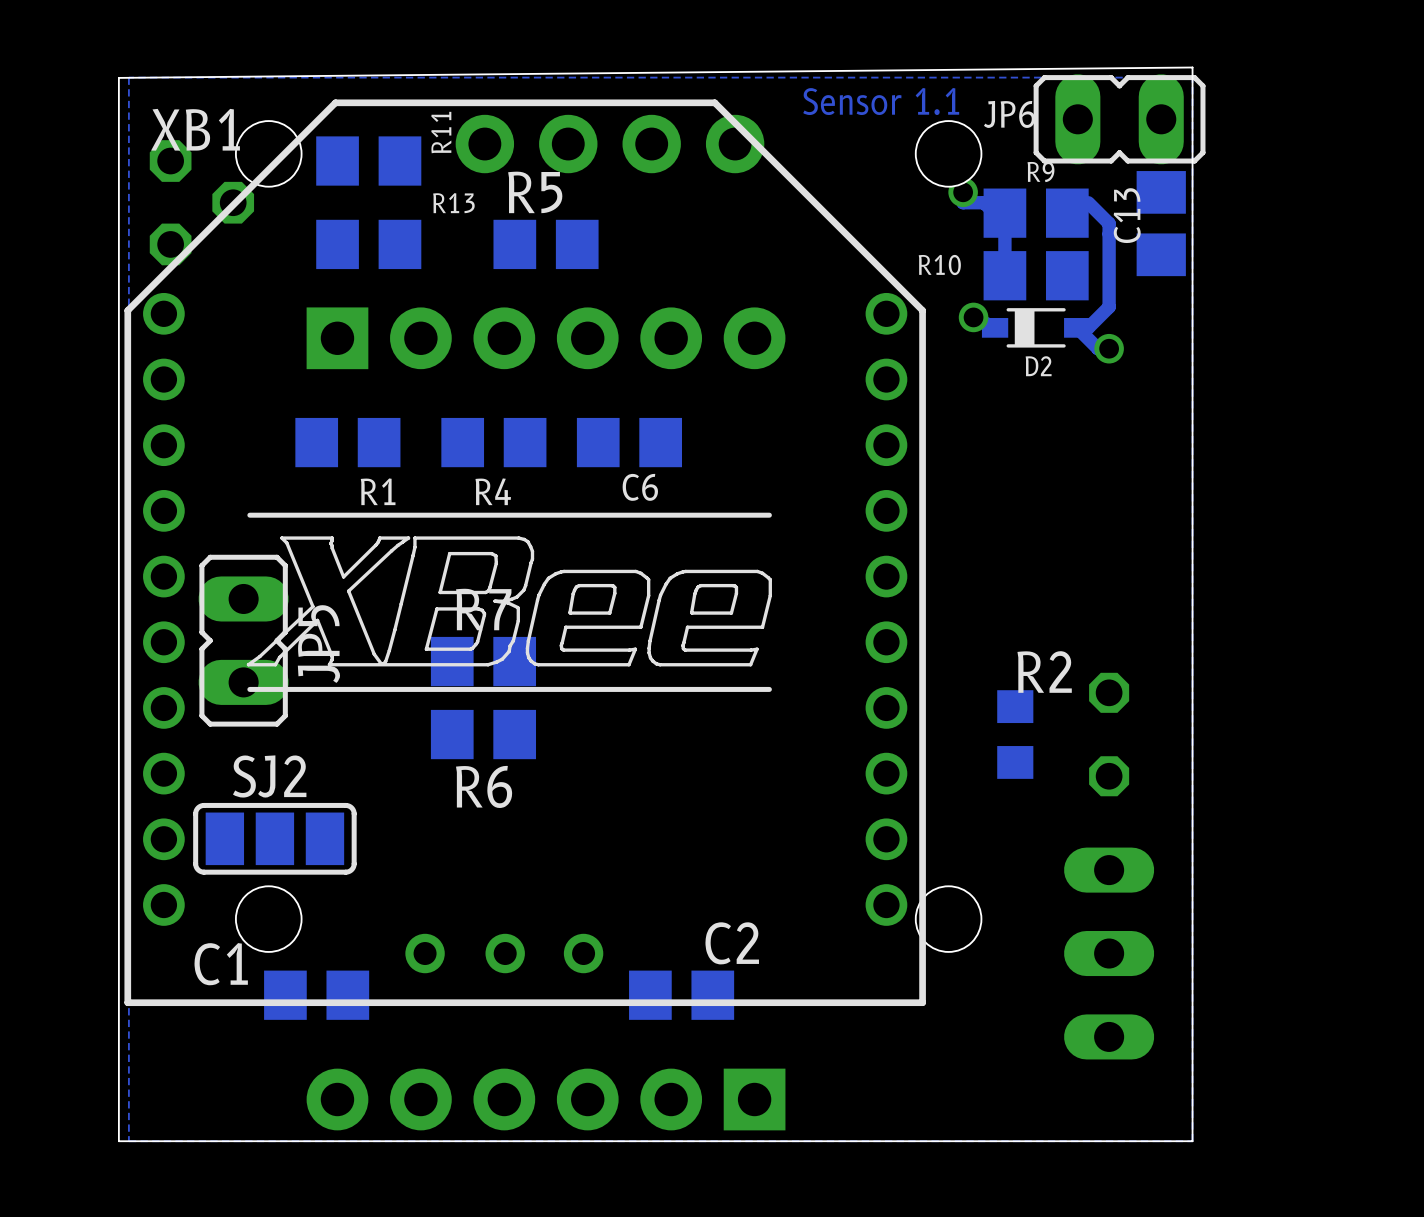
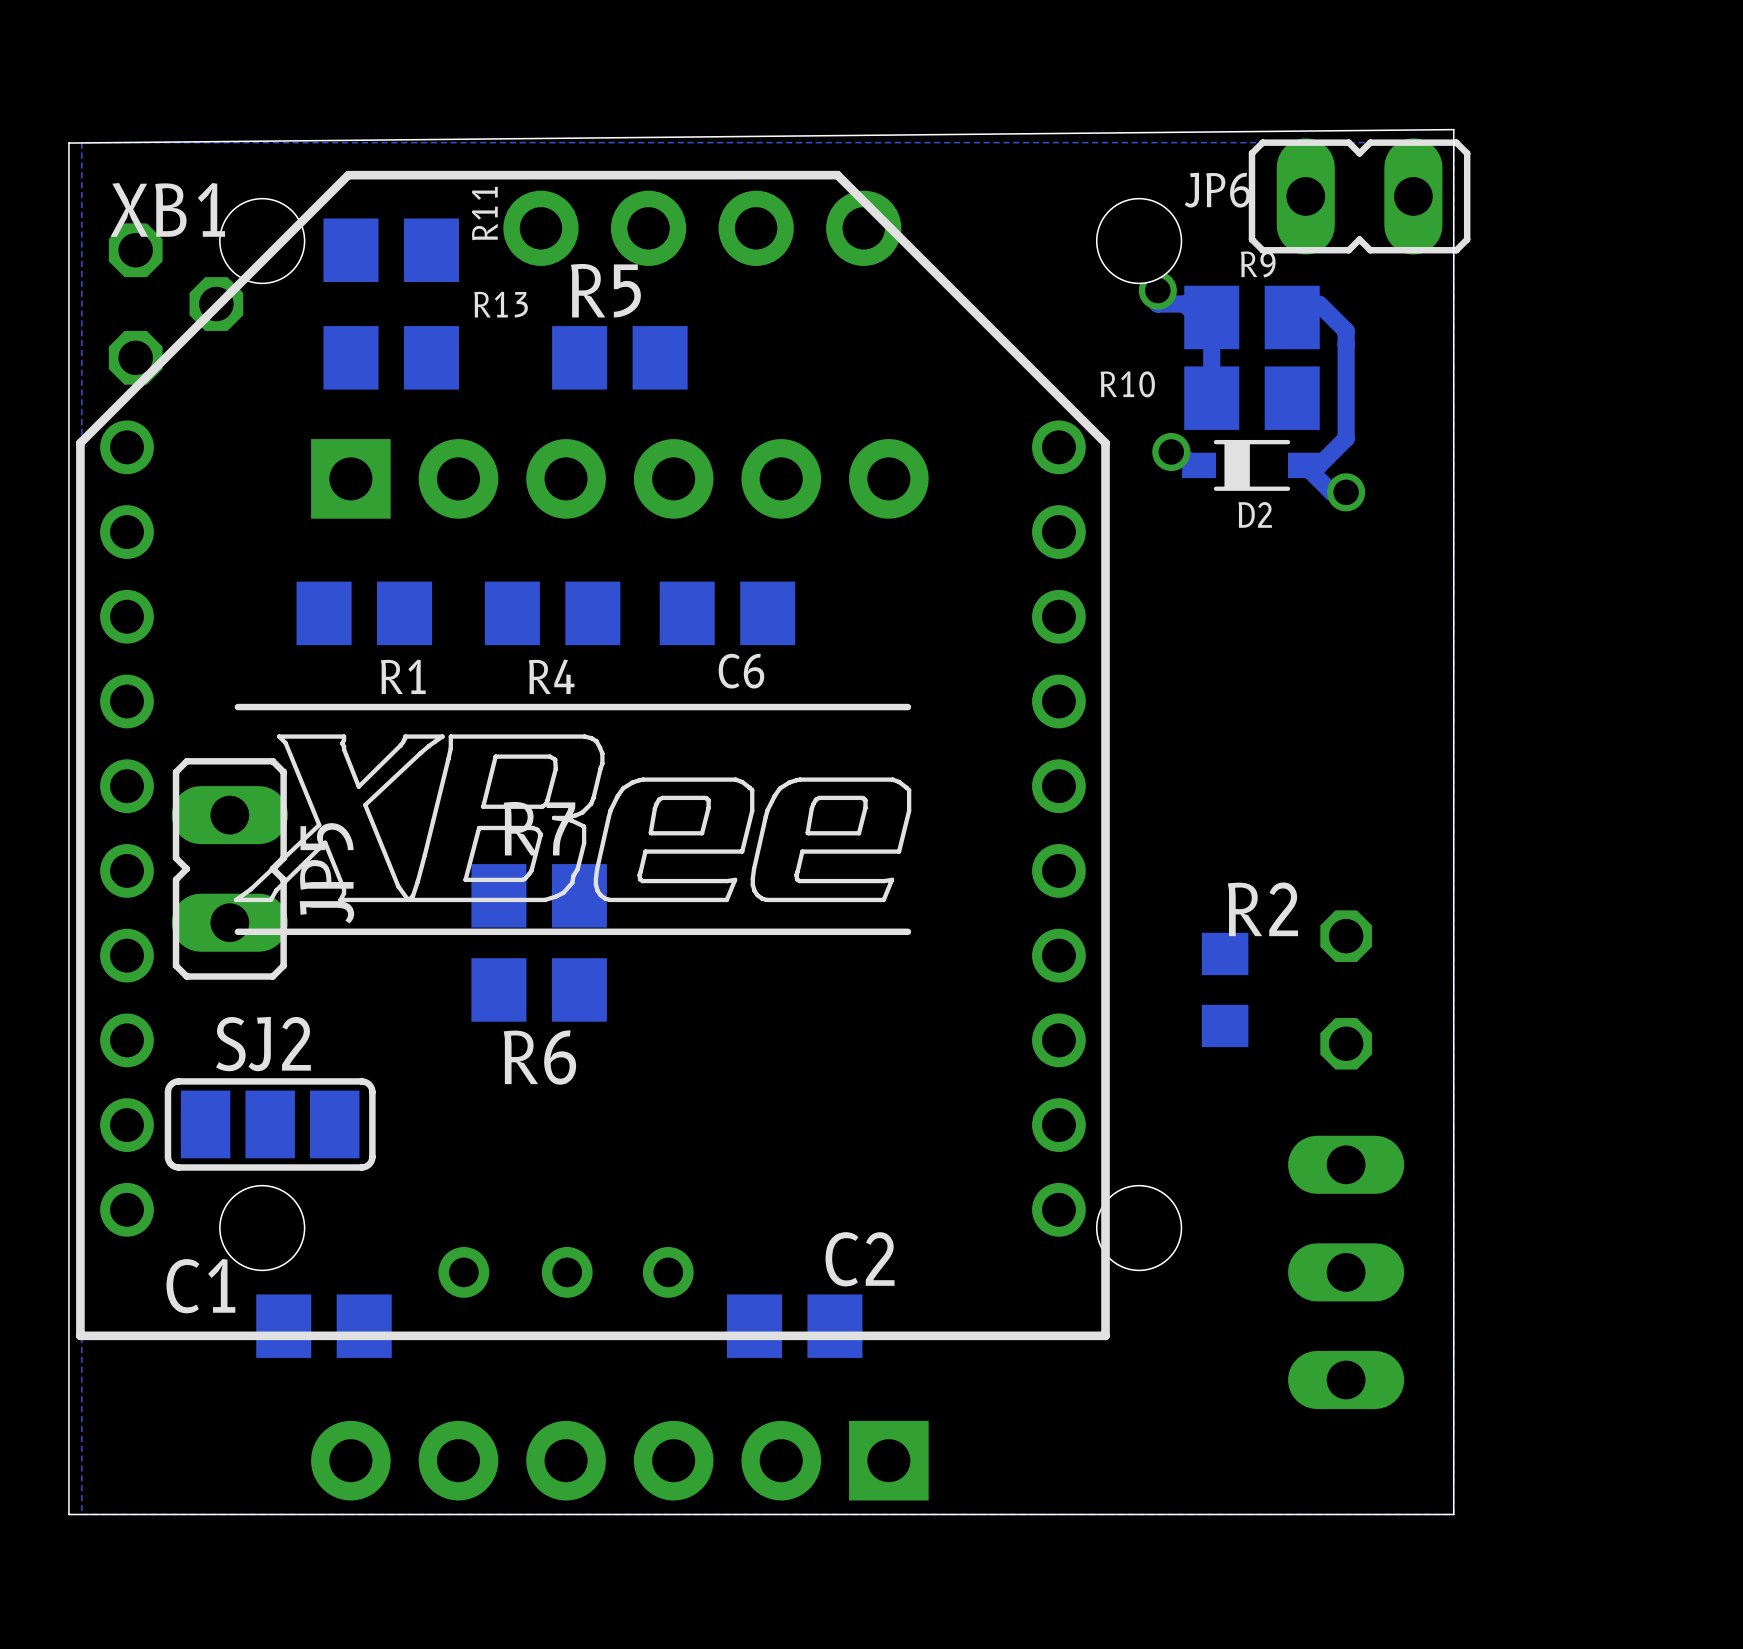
text: Sensor 1.1 (881, 101) -> none
C13: (1161, 223) -> none

